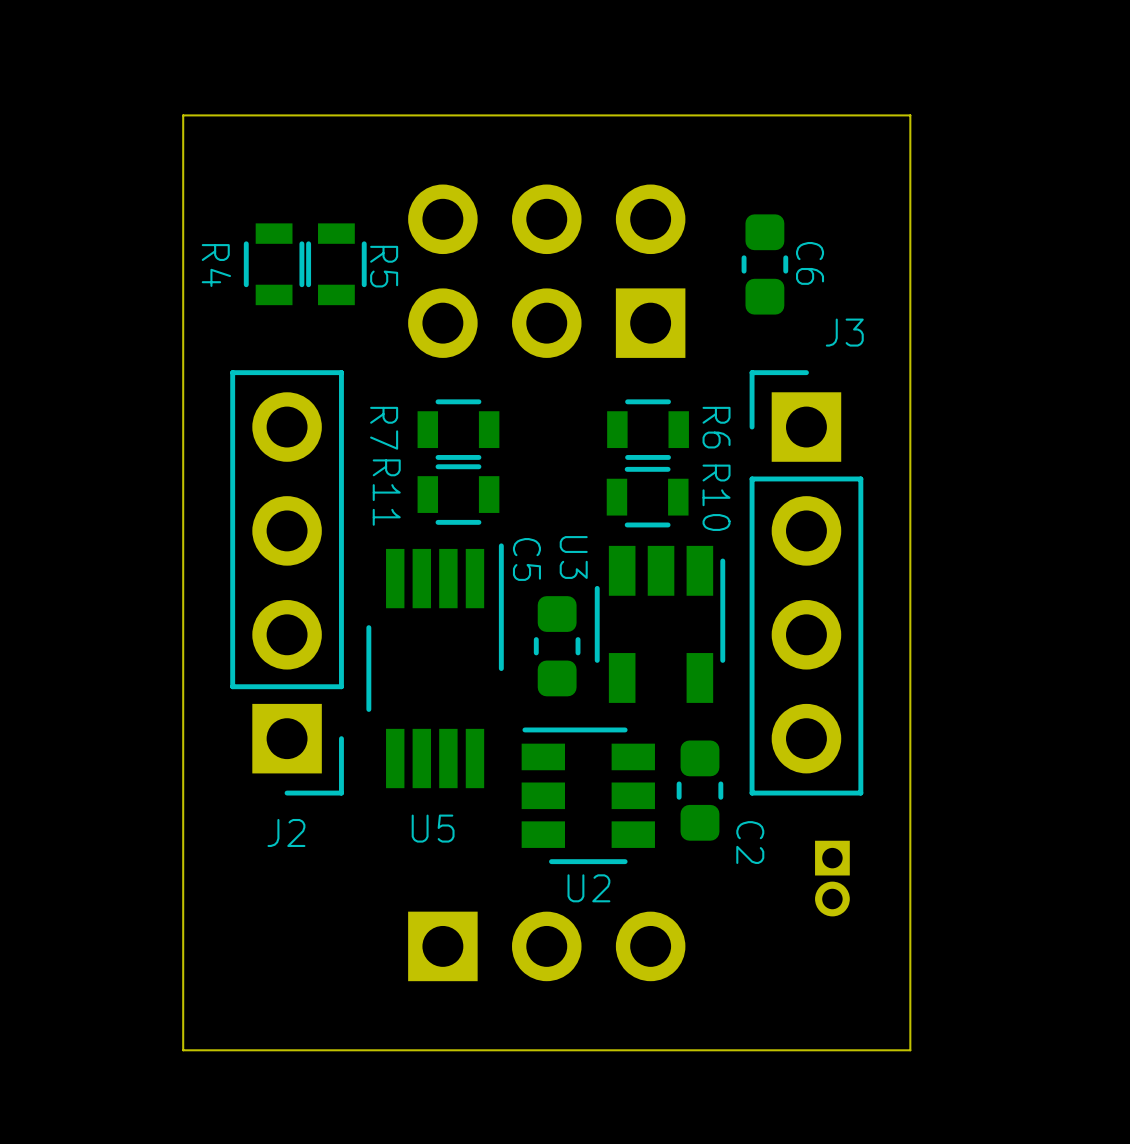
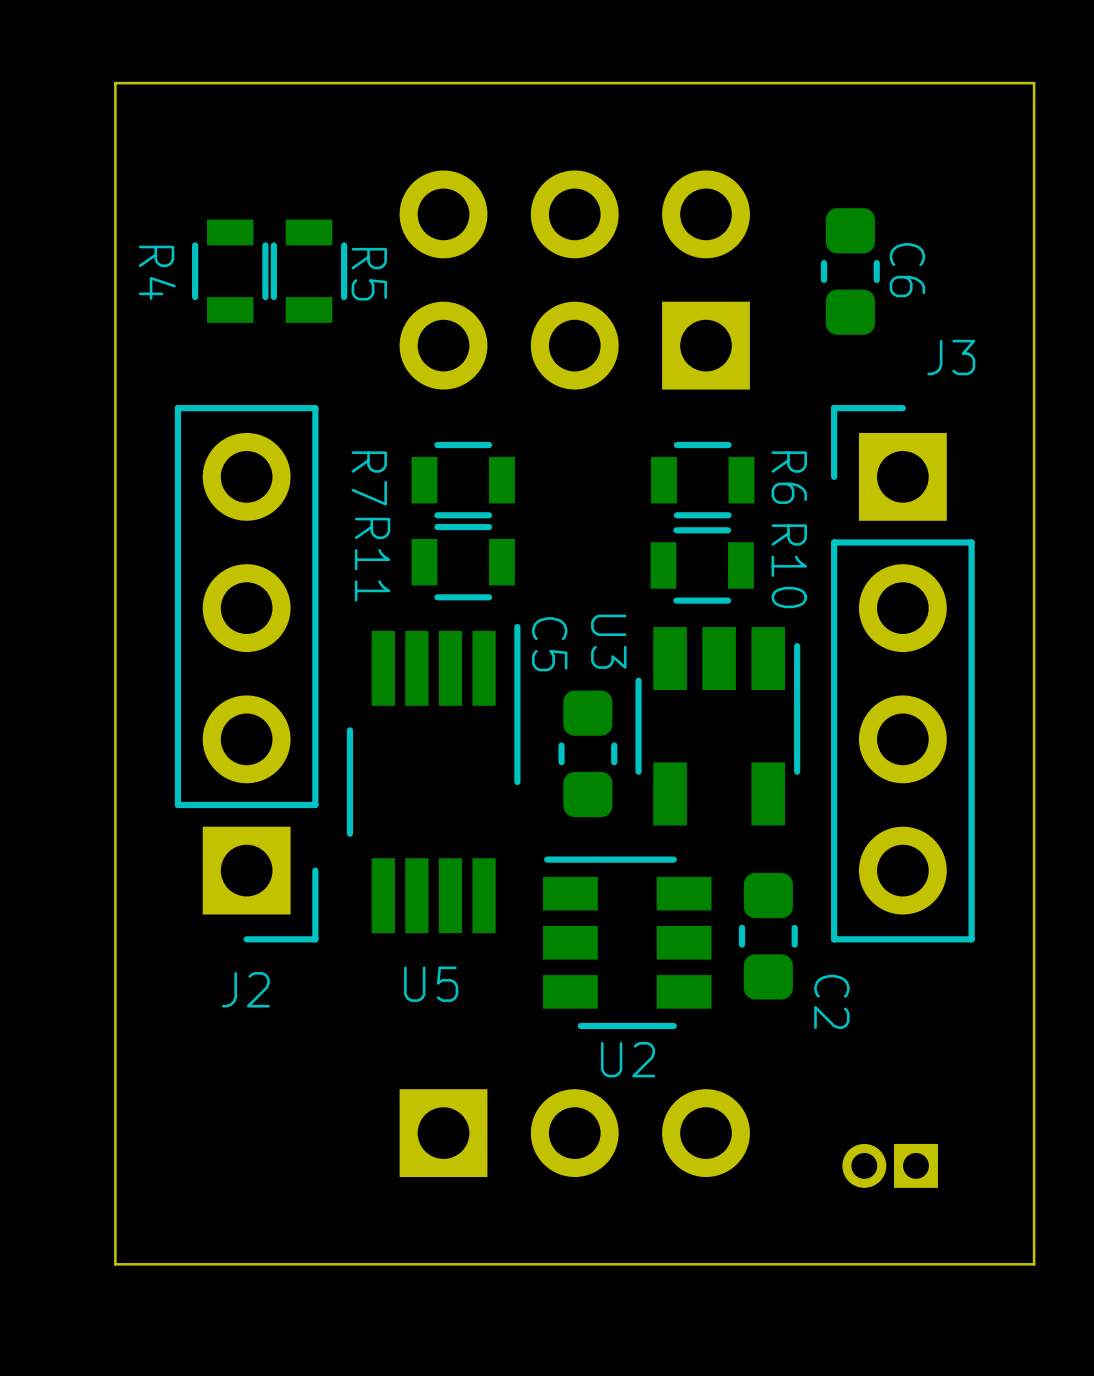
part rotation: 0° (832, 878) -> 90° clockwise (890, 1165)
part position: (832, 878) -> (890, 1165)

